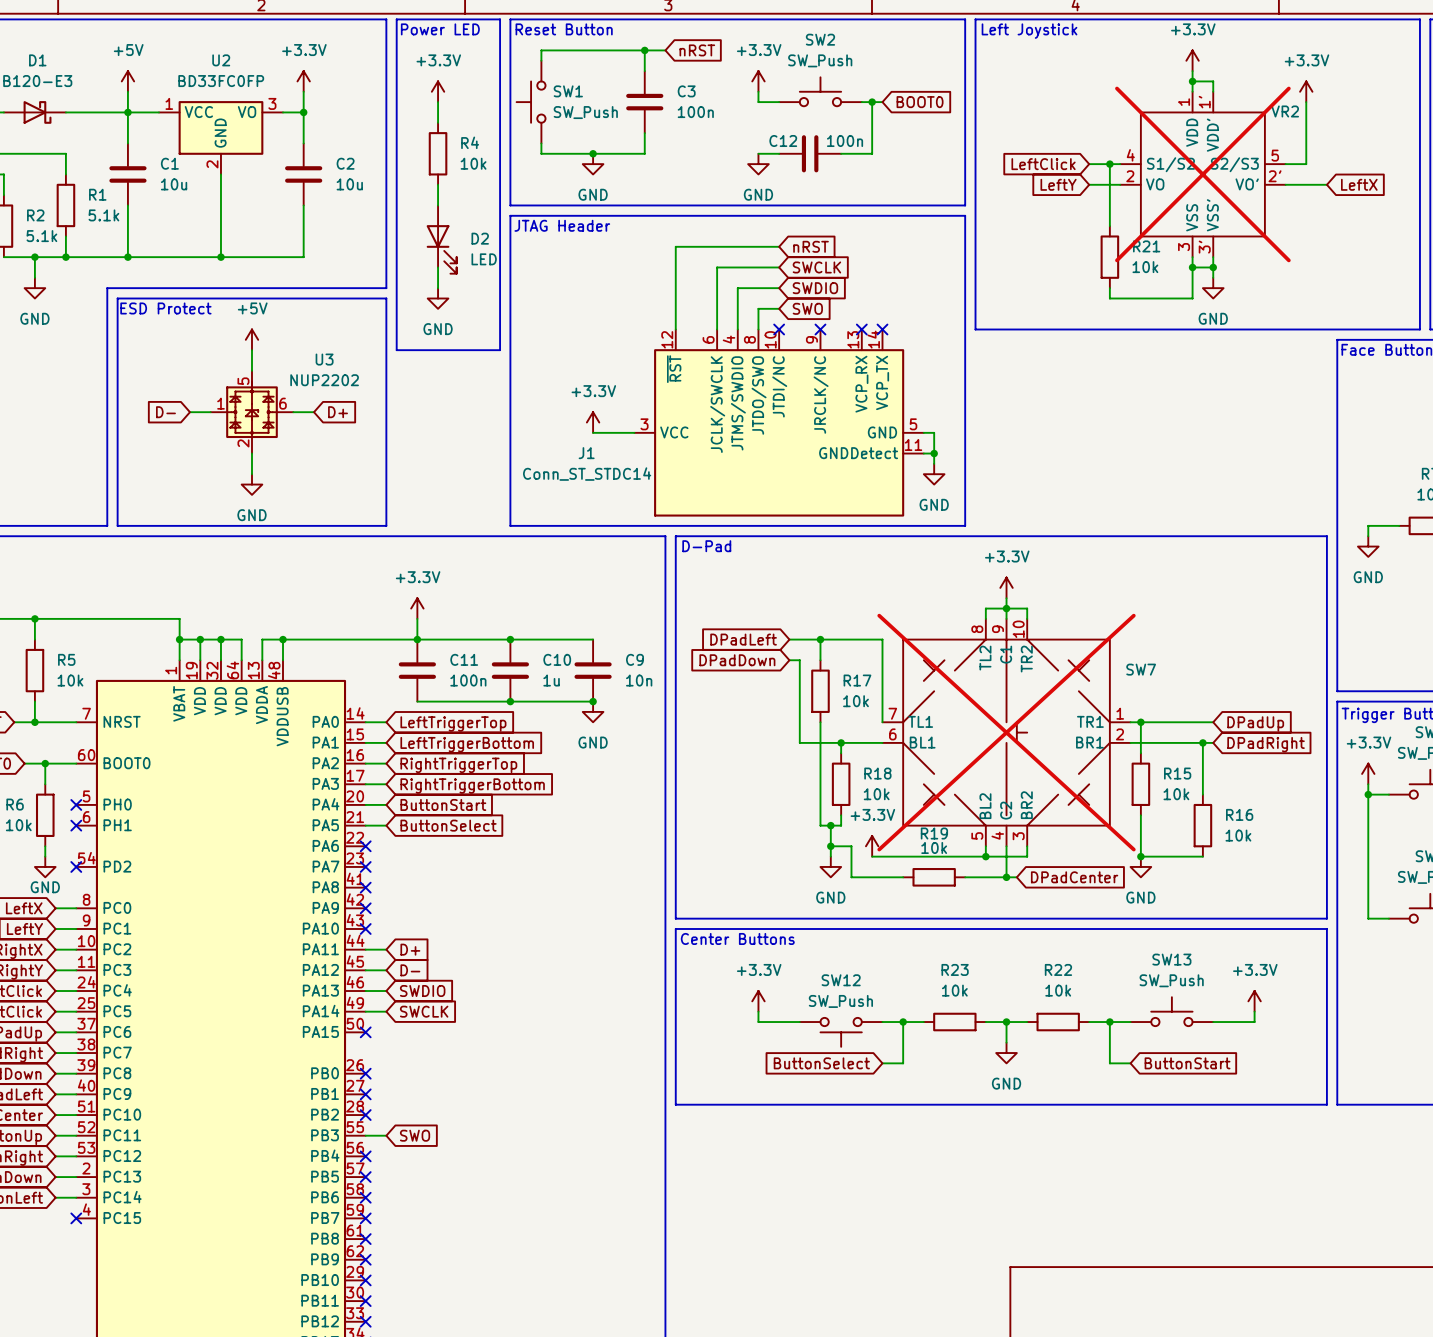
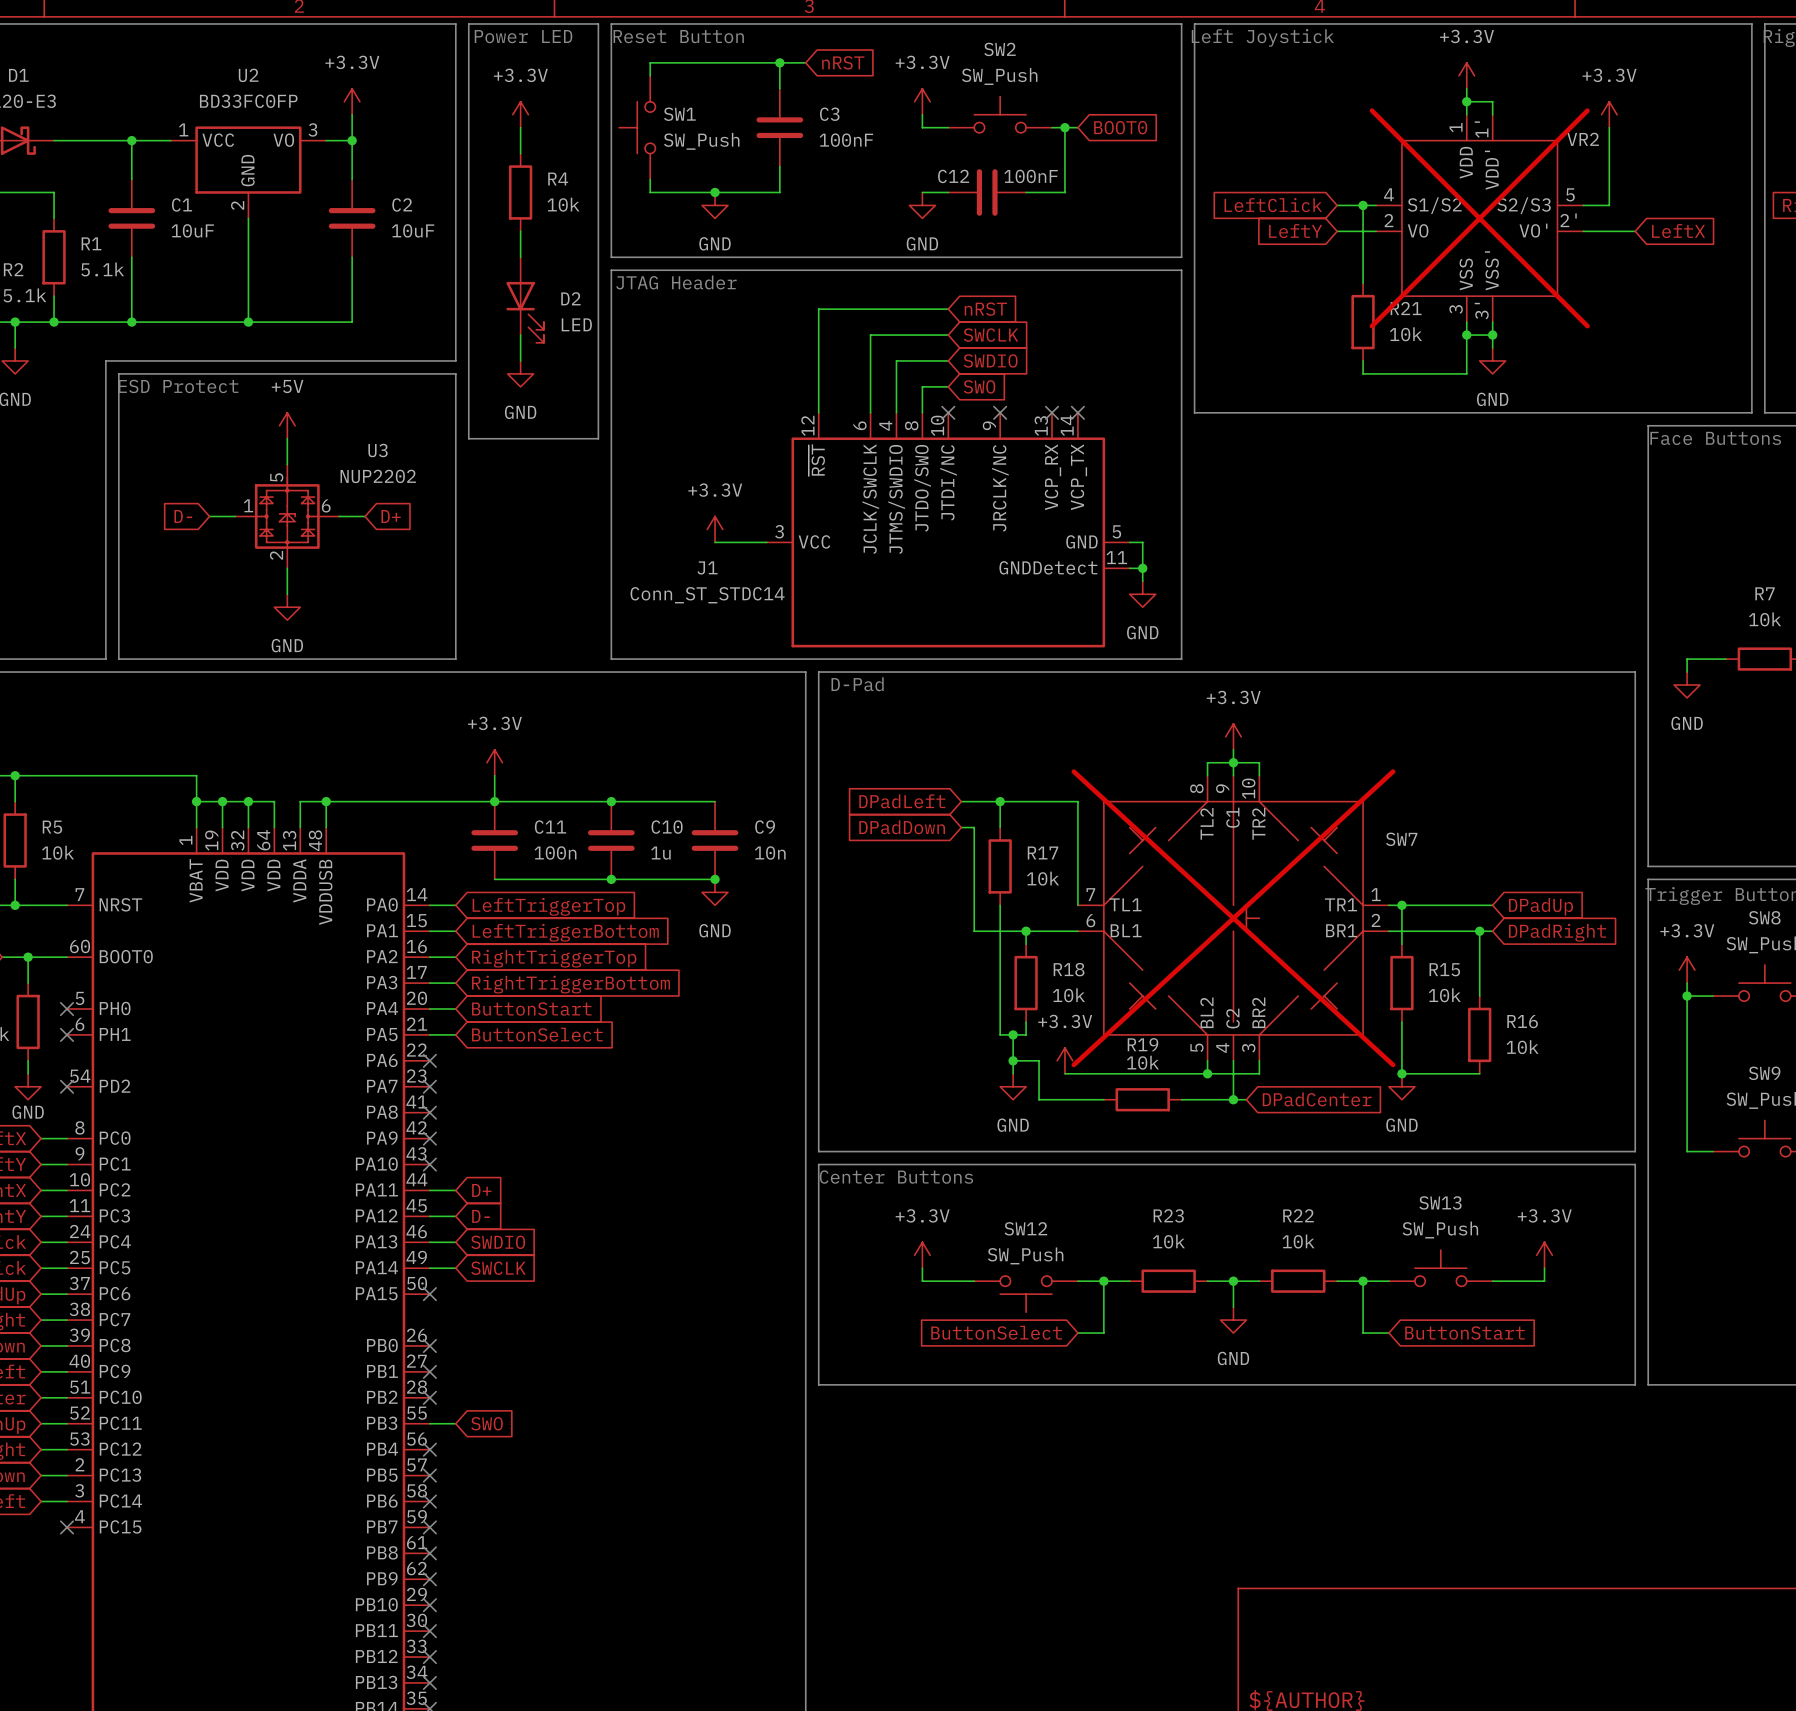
power symbol: +5V (127, 81) -> none
wire: (127, 91) (127, 112) -> none
C3 value: 100n (695, 112) -> 100nF (846, 140)
C12 value: 100n (845, 141) -> 100nF (1031, 176)
C1 value: 10u (174, 184) -> 10uF (192, 230)
C2 value: 10u (349, 184) -> 10uF (413, 230)

